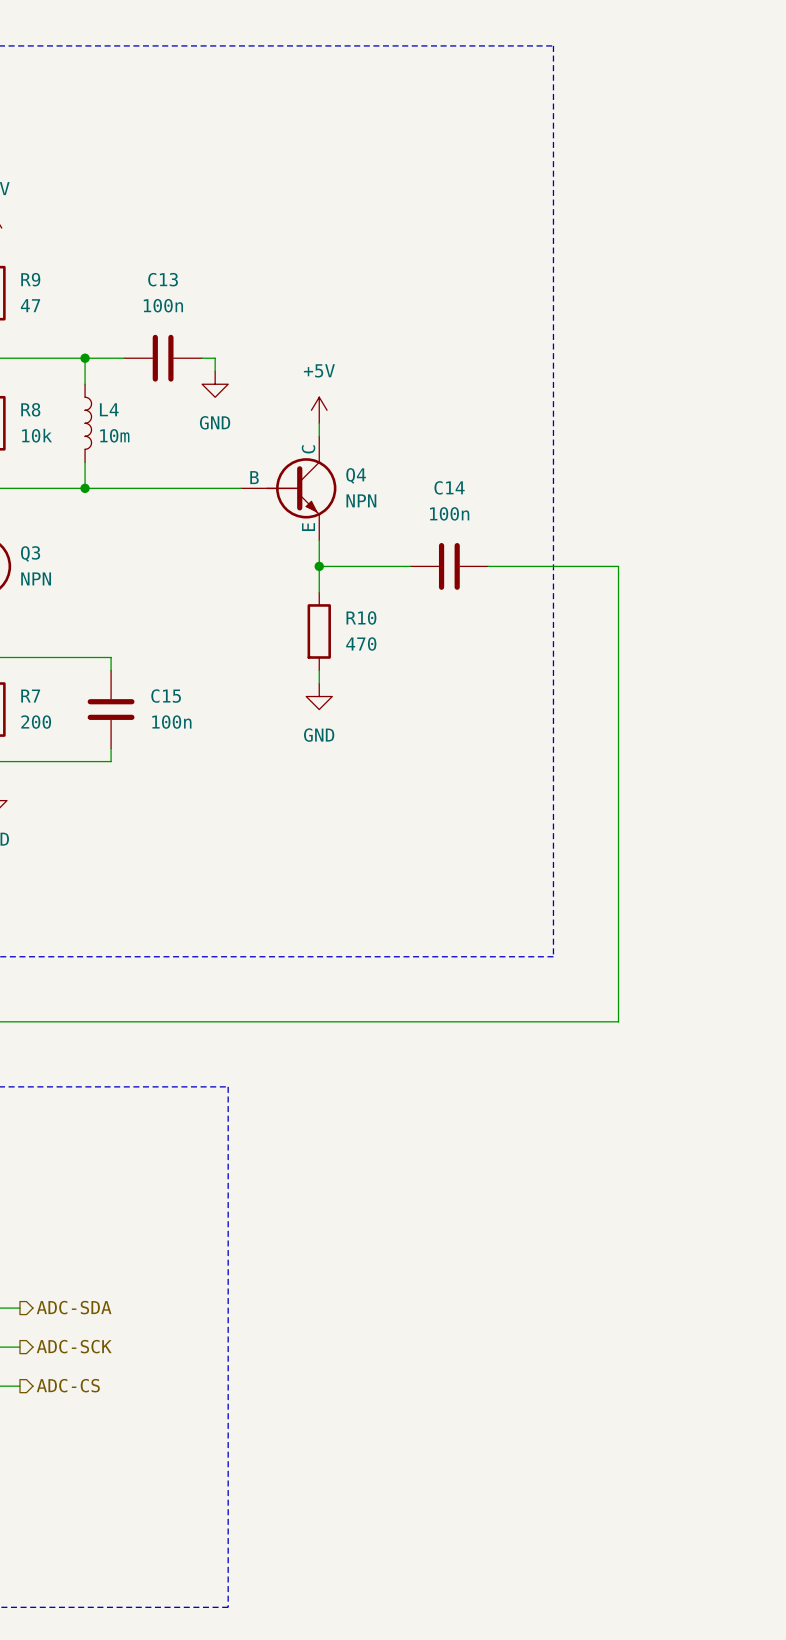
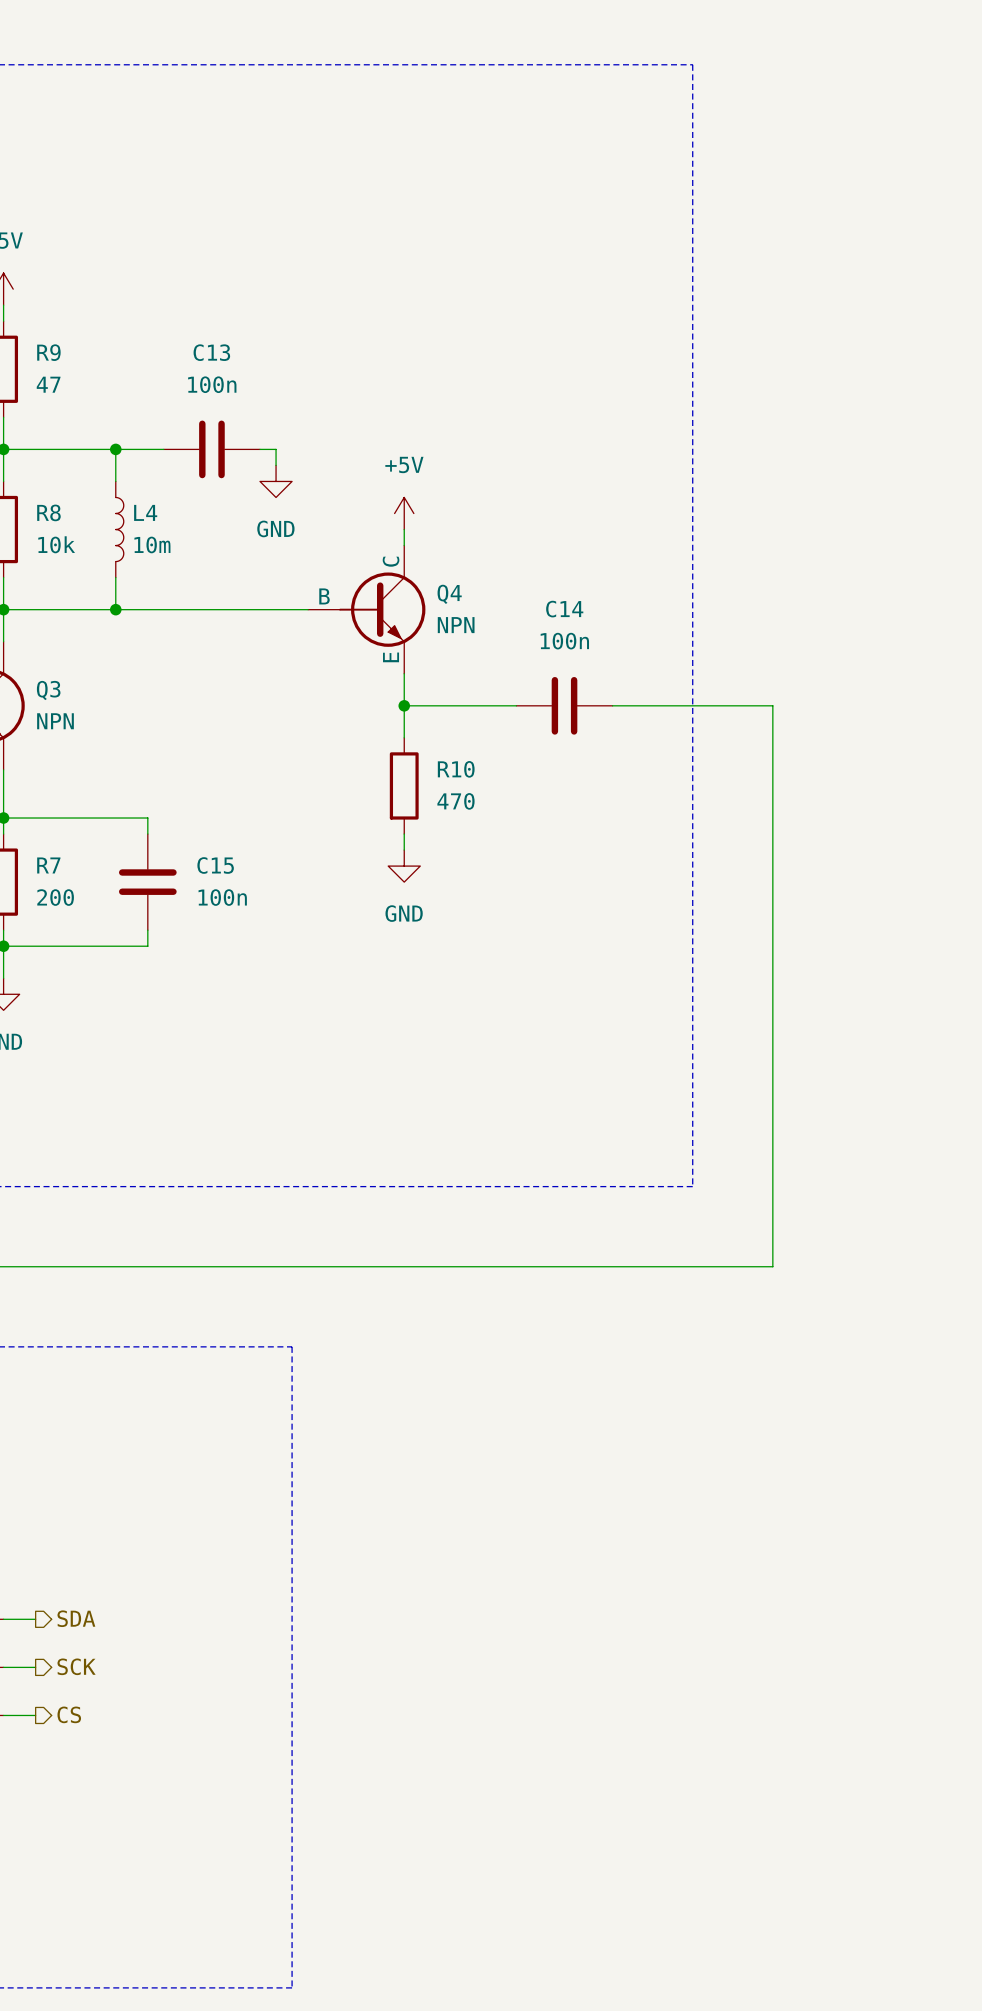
hierarchical label: ADC-SDA (74, 1307) -> SDA (76, 1618)
hierarchical label: ADC-SCK (74, 1346) -> SCK (76, 1666)
hierarchical label: ADC-CS (68, 1385) -> CS (69, 1714)

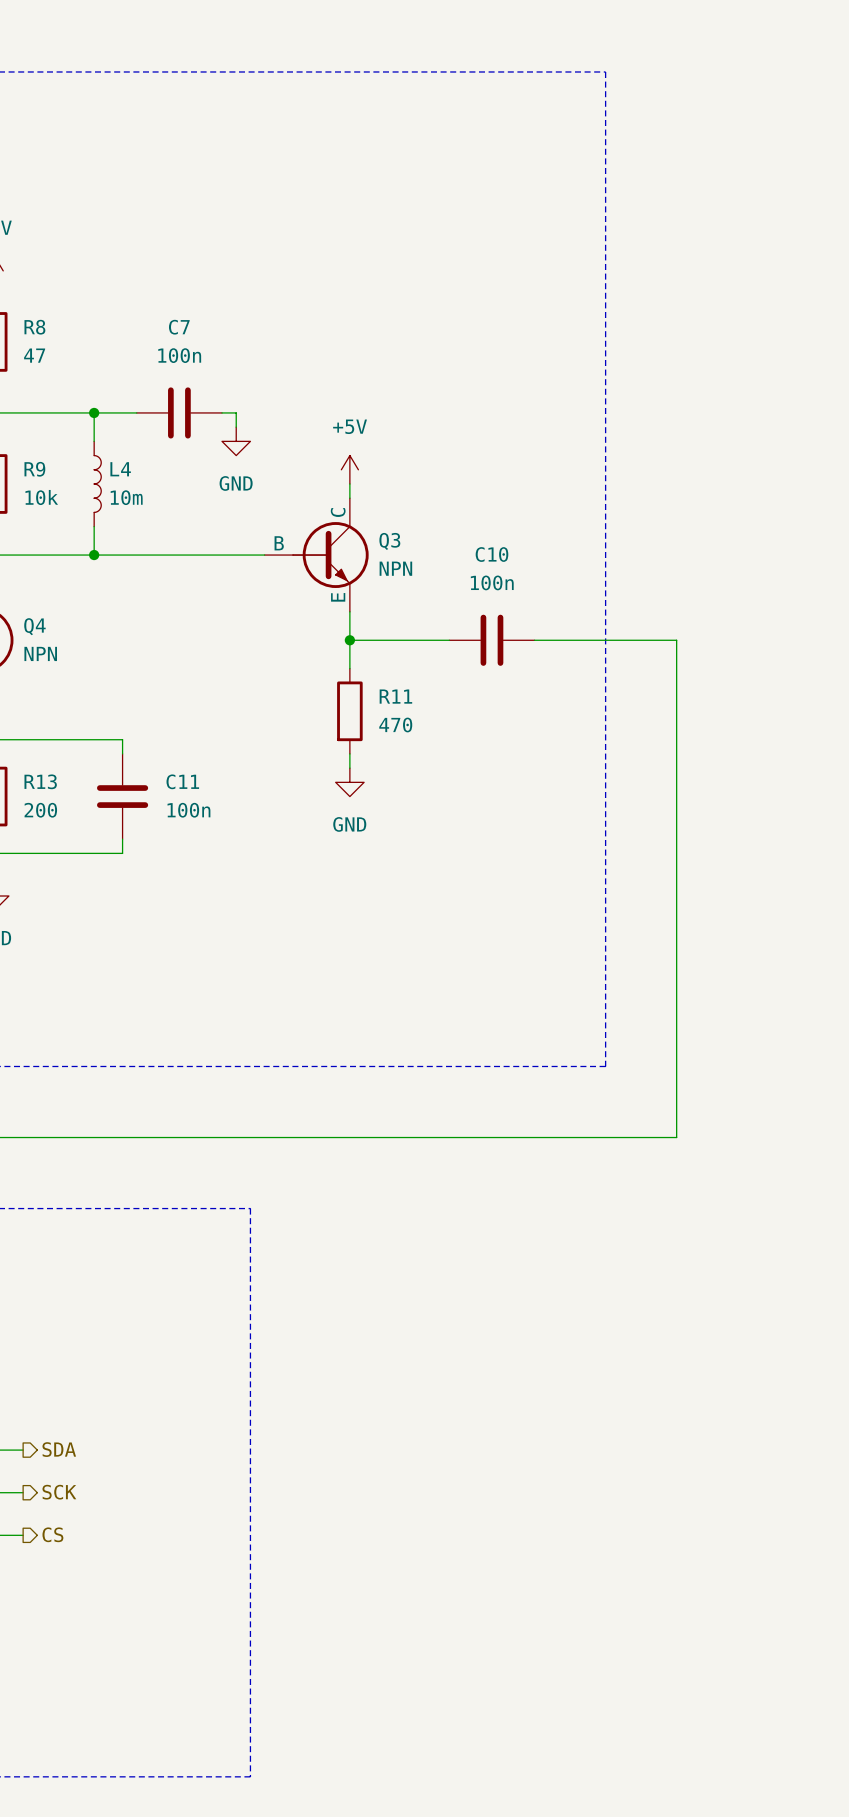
R9 name: R9 (48, 352) -> R8 (34, 327)
C13 name: C13 (211, 352) -> C7 (179, 327)
R8 name: R8 (48, 512) -> R9 (34, 469)
Q4 name: Q4 (449, 594) -> Q3 (389, 541)
C14 name: C14 (564, 609) -> C10 (491, 554)
Q3 name: Q3 (48, 690) -> Q4 (34, 626)
R10 name: R10 (456, 769) -> R11 (395, 696)
R7 name: R7 (48, 865) -> R13 (40, 781)
C15 name: C15 (215, 865) -> C11 (182, 781)

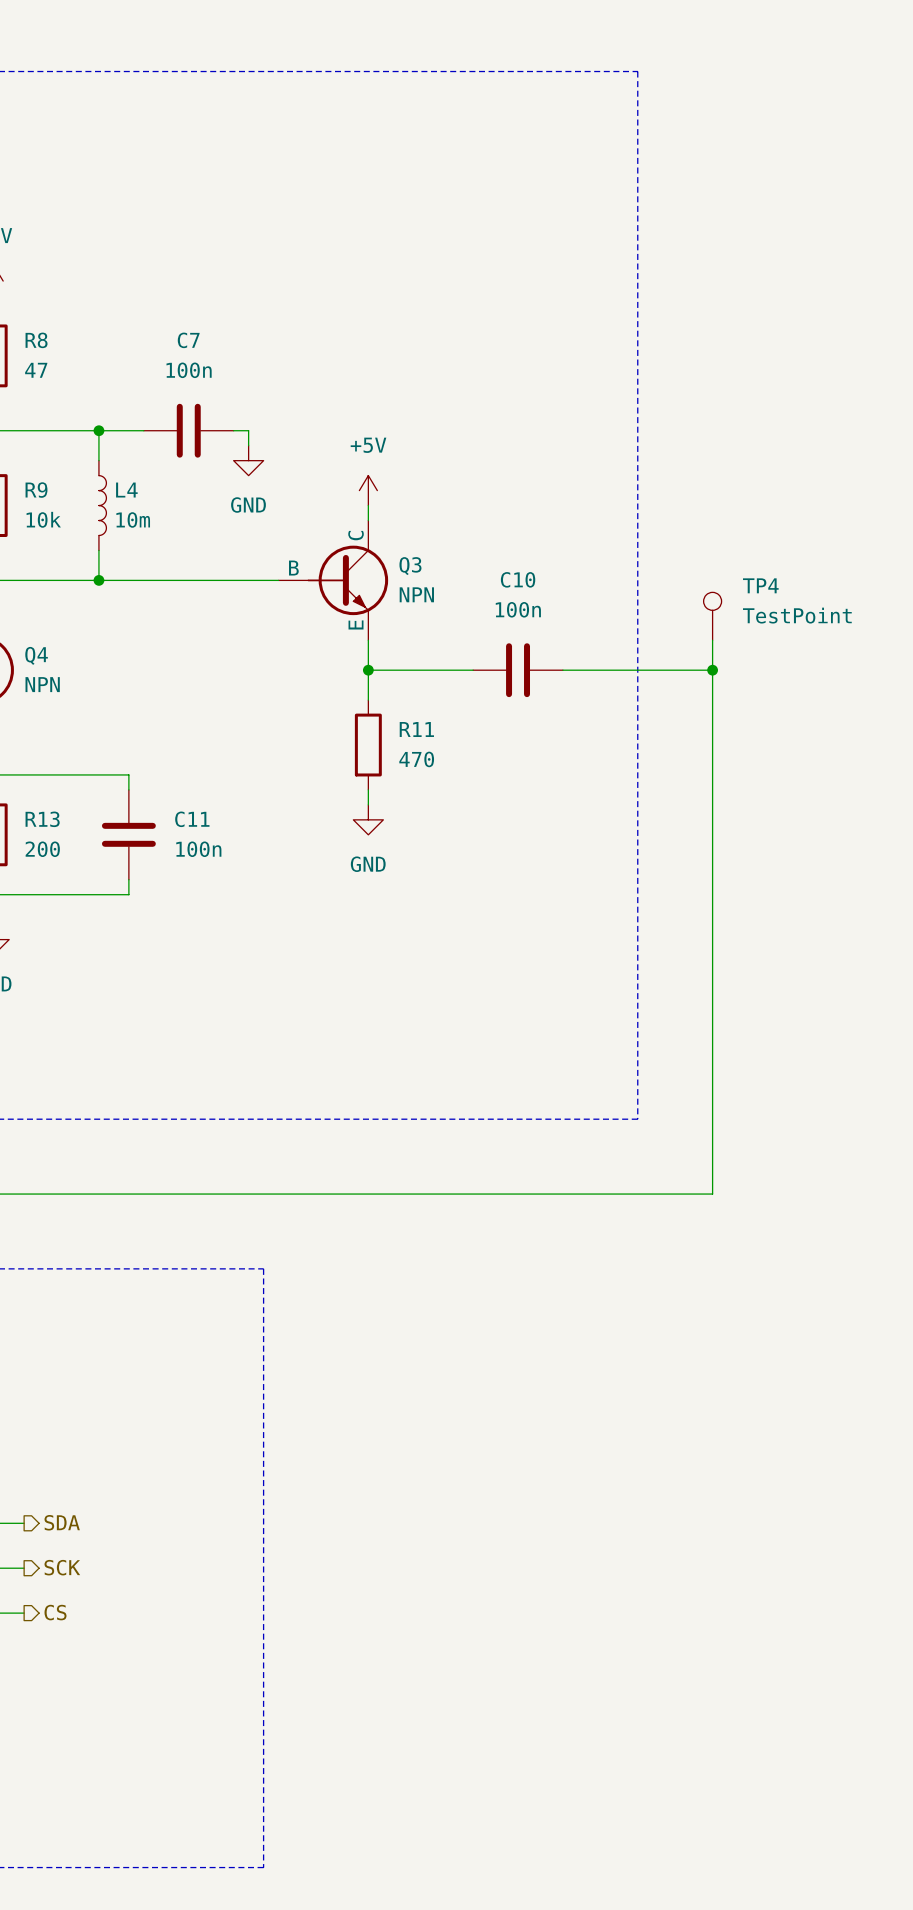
TP4: none -> TestPoint (712, 616)
wire: none -> (712, 640) (712, 670)
junction: none -> (712, 670)

